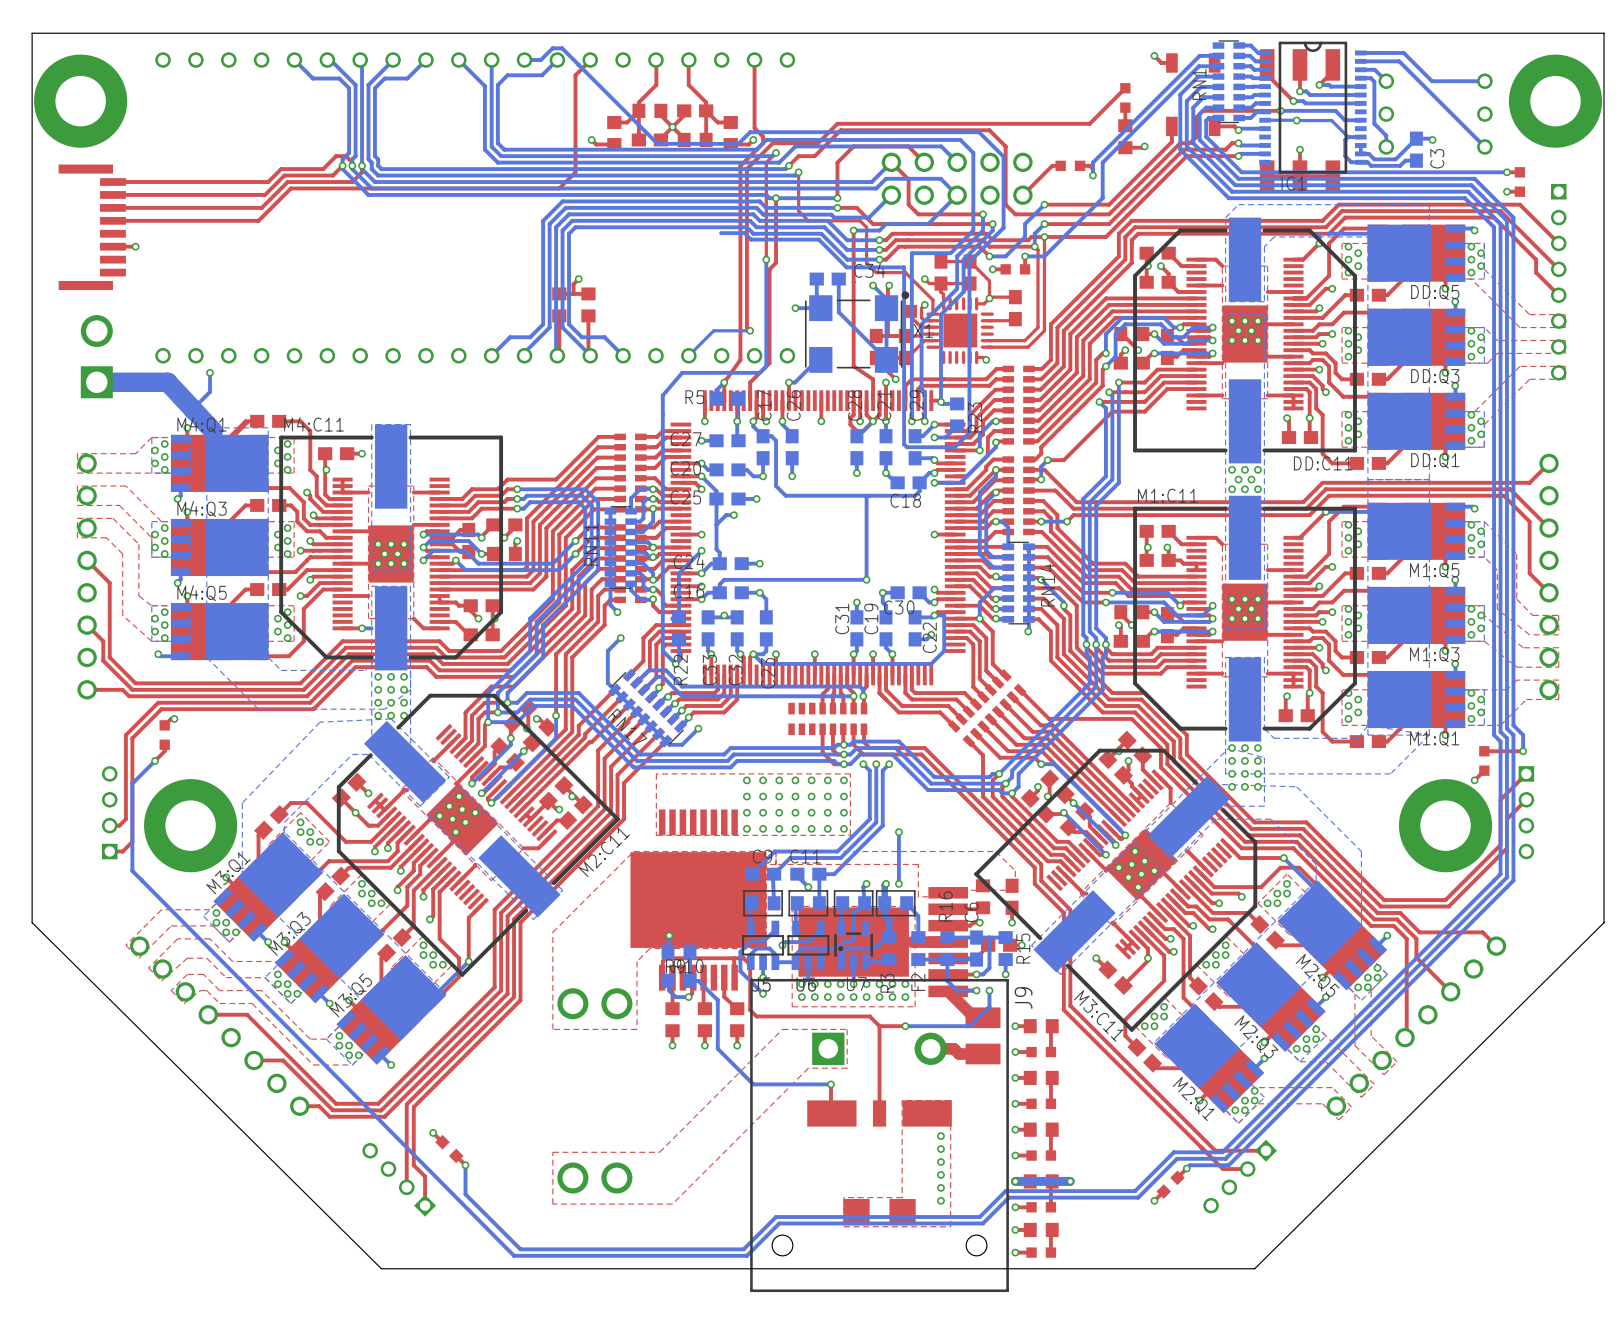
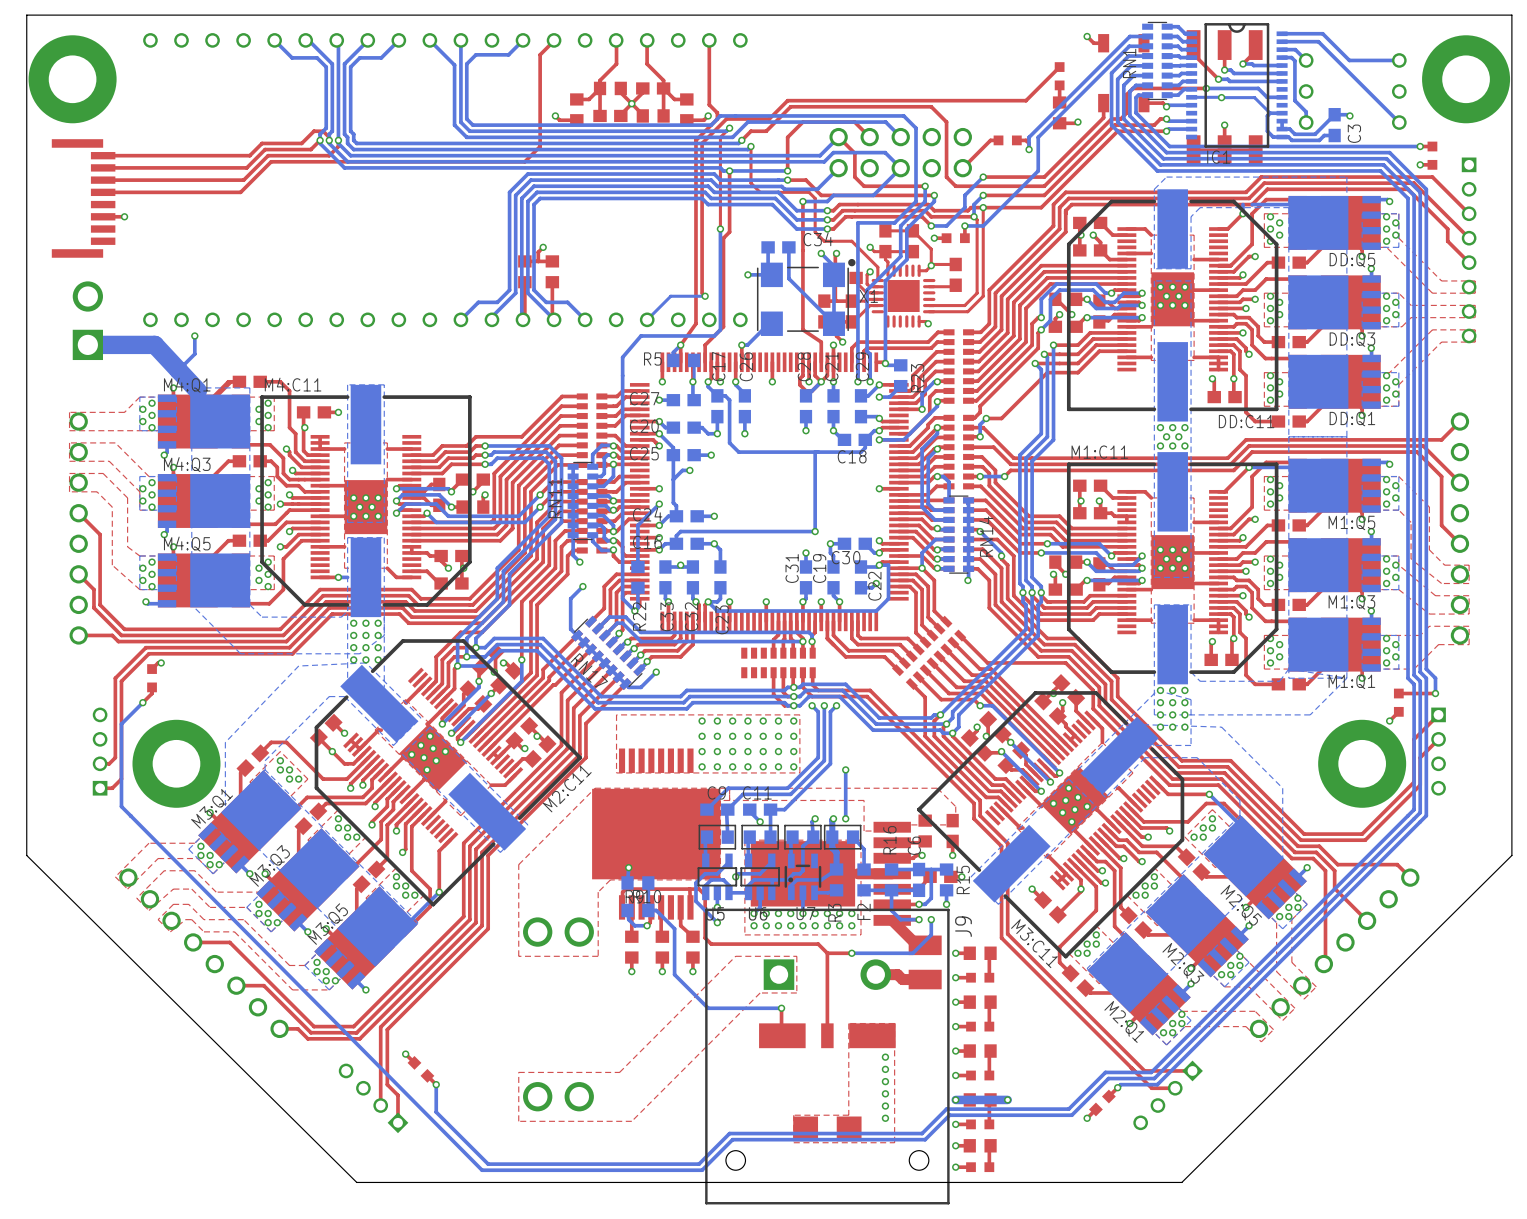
bottom track: (524, 60) (540, 60) (552, 48) (562, 48) (657, 143) (738, 143) (750, 132) (979, 132) (1003, 156) (1003, 227) (969, 262) (969, 432) (954, 447) (907, 447) (904, 444) (904, 267) (846, 267) (818, 239) (750, 239) (744, 233) (721, 233) -> none

